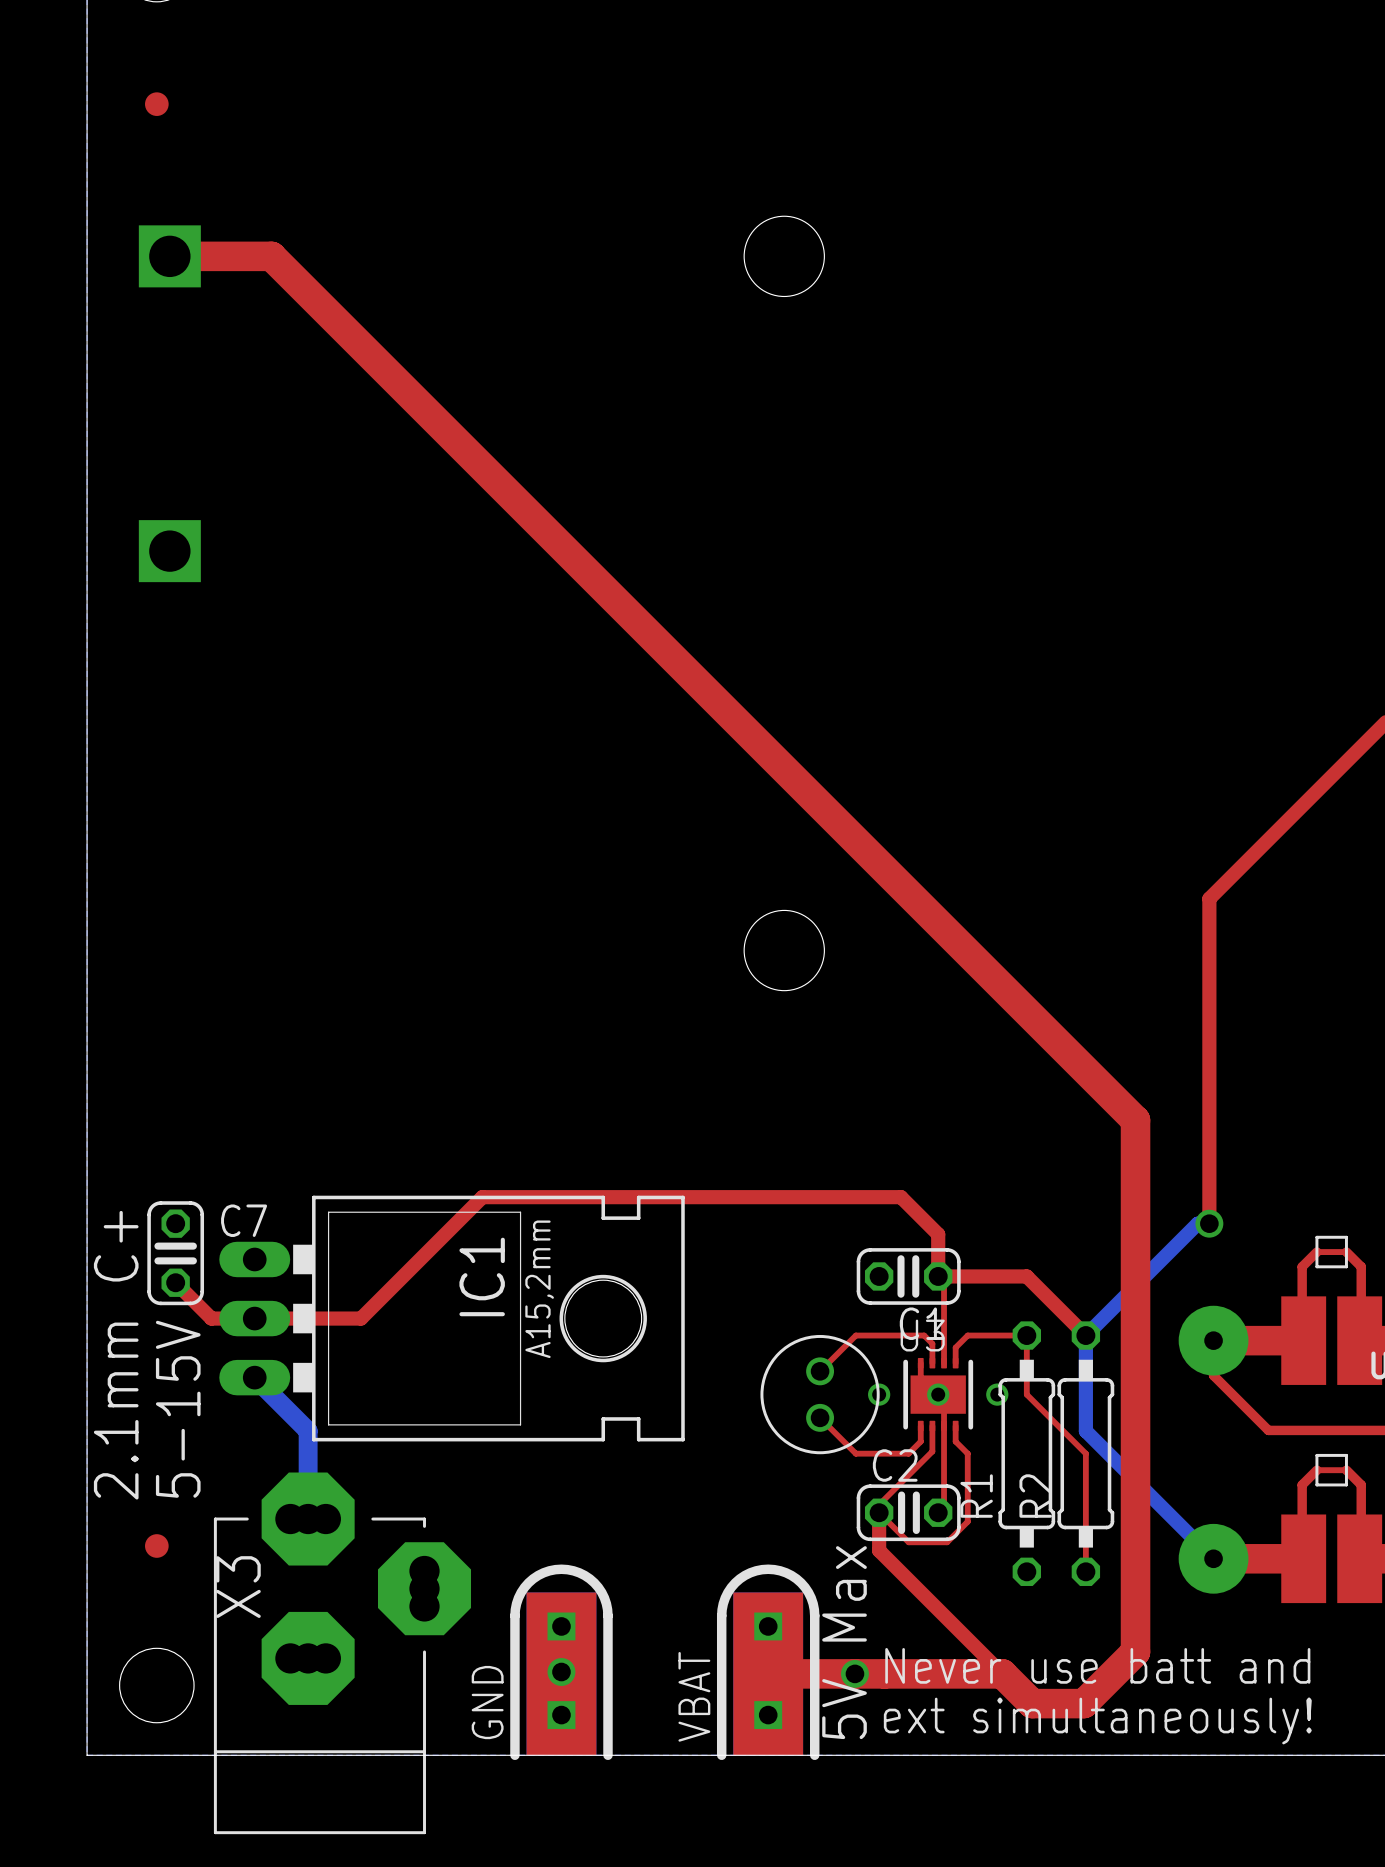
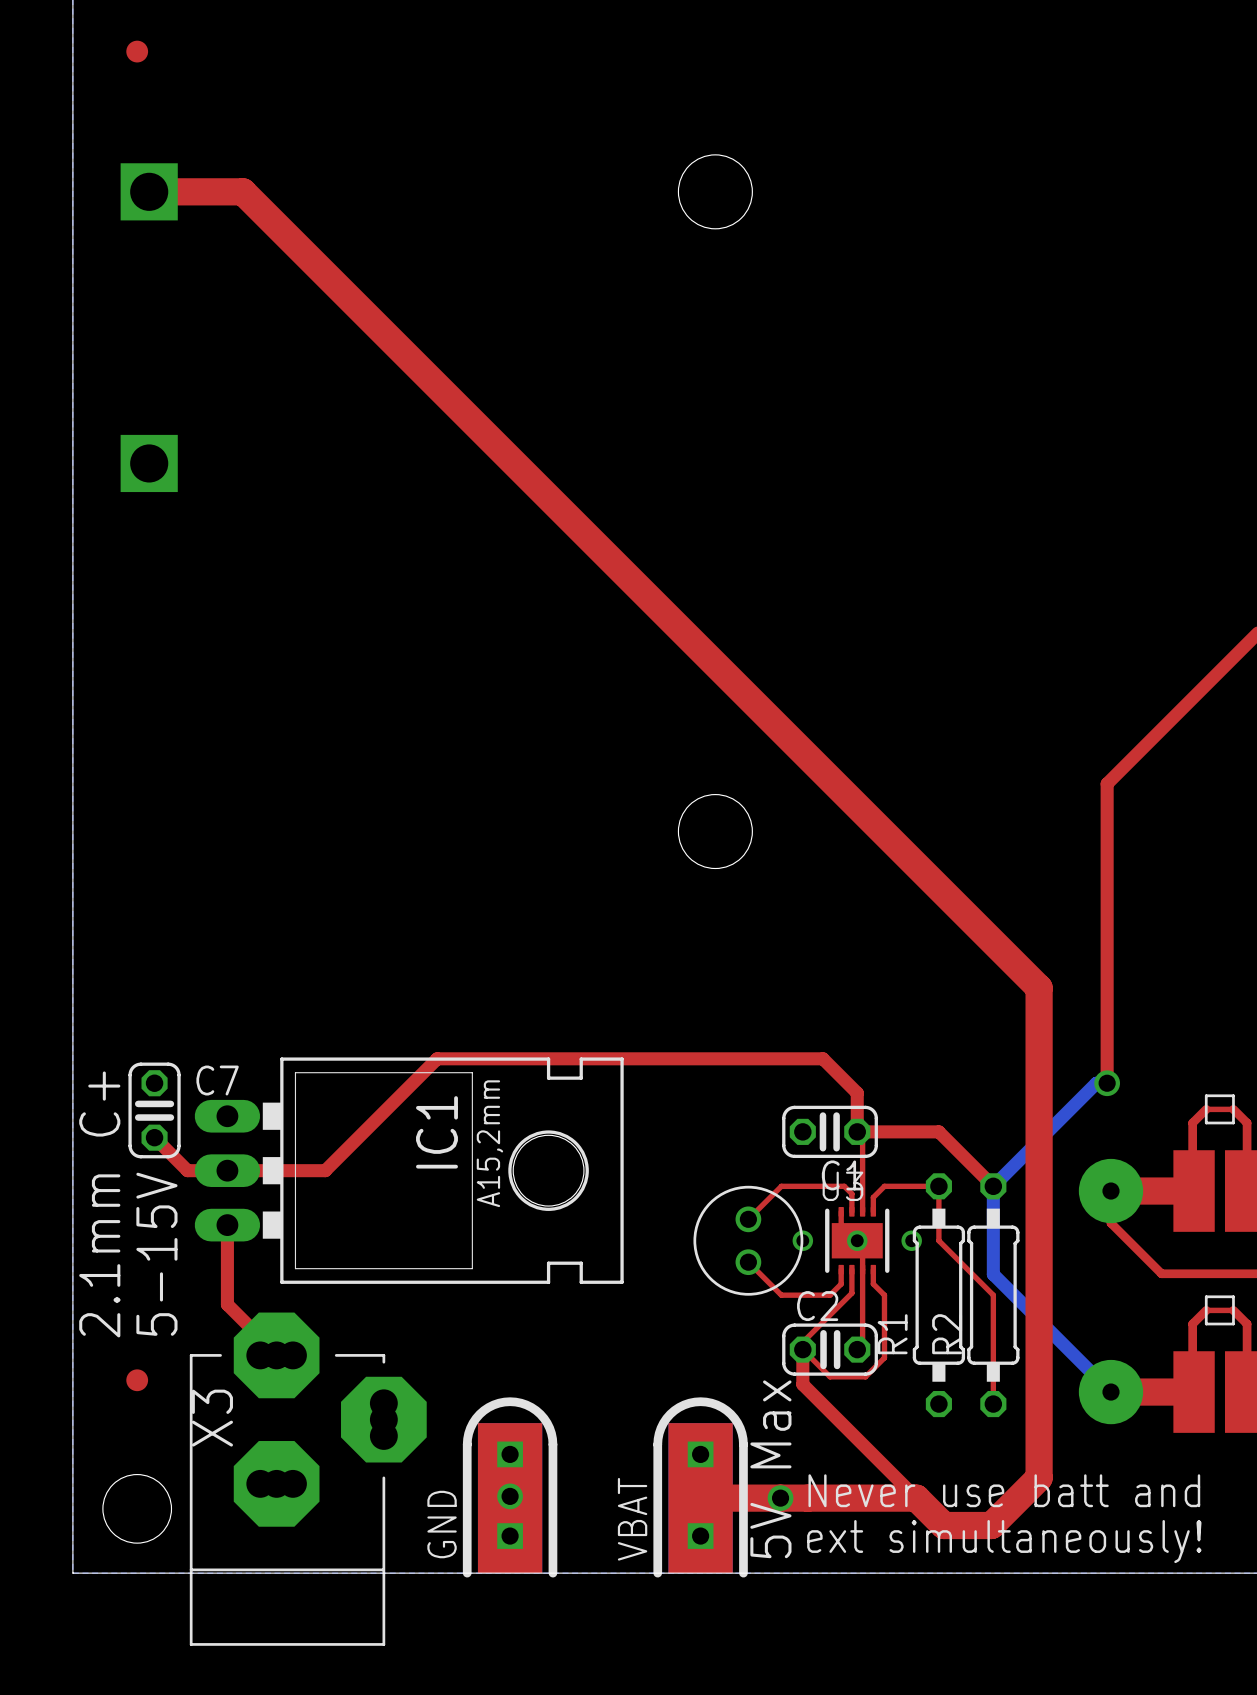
top track: none -> (227, 1225) (227, 1304) (276, 1355)
bottom track: (254, 1377) (308, 1431) (308, 1519) -> none

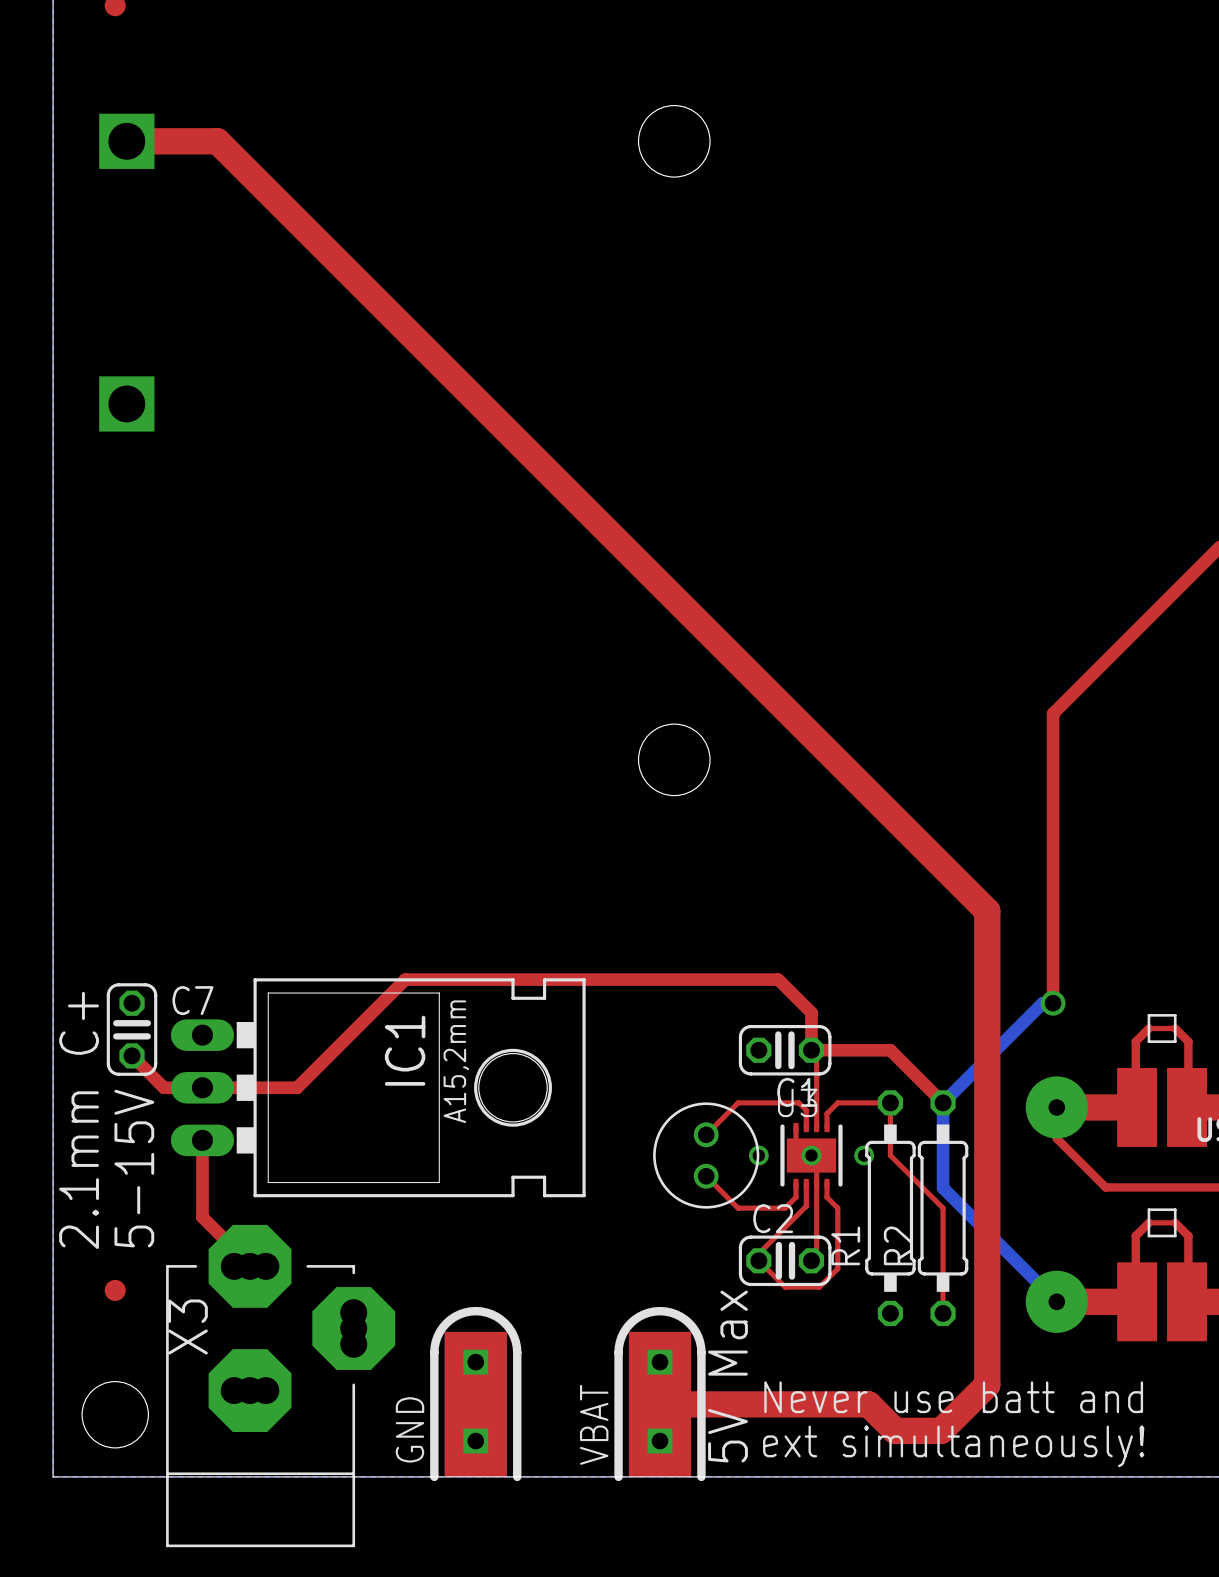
top track: (802, 1349) (802, 1384) (916, 1498) -> none
via: (510, 1496) -> none
via: (780, 1498) -> none

